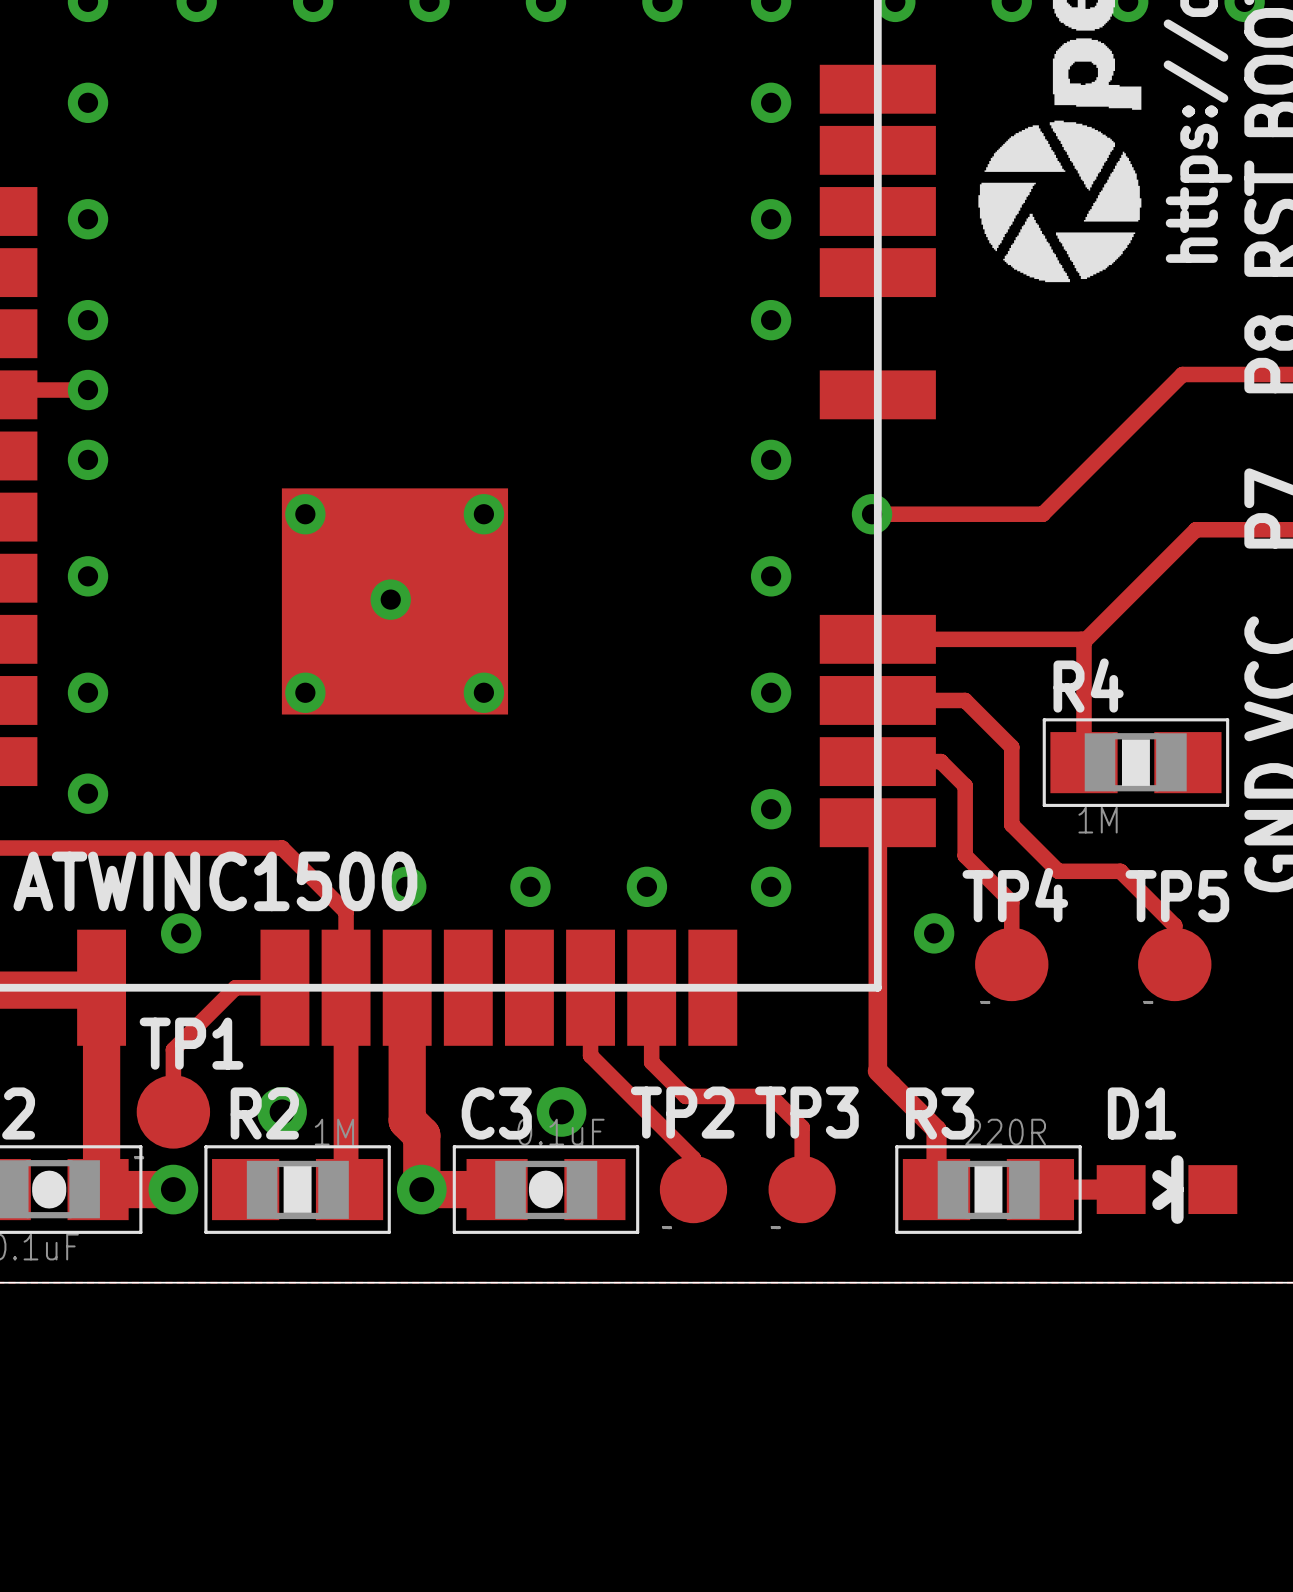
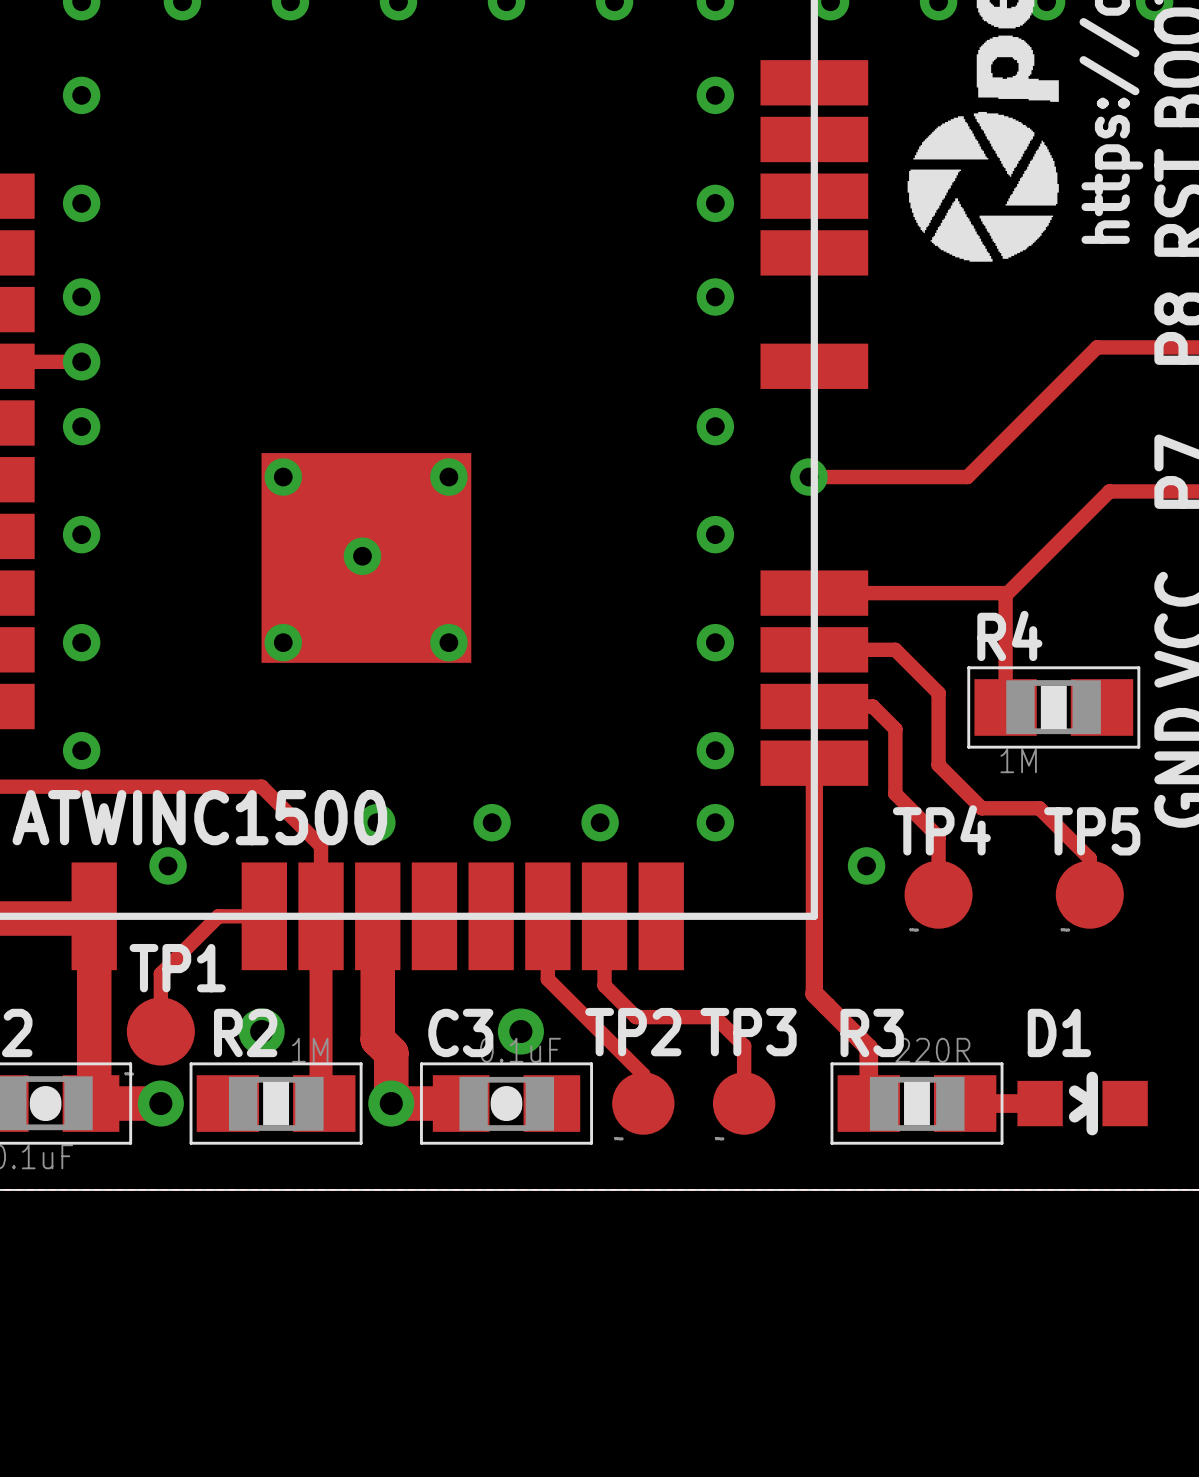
via position: (88, 793) -> (81, 750)

